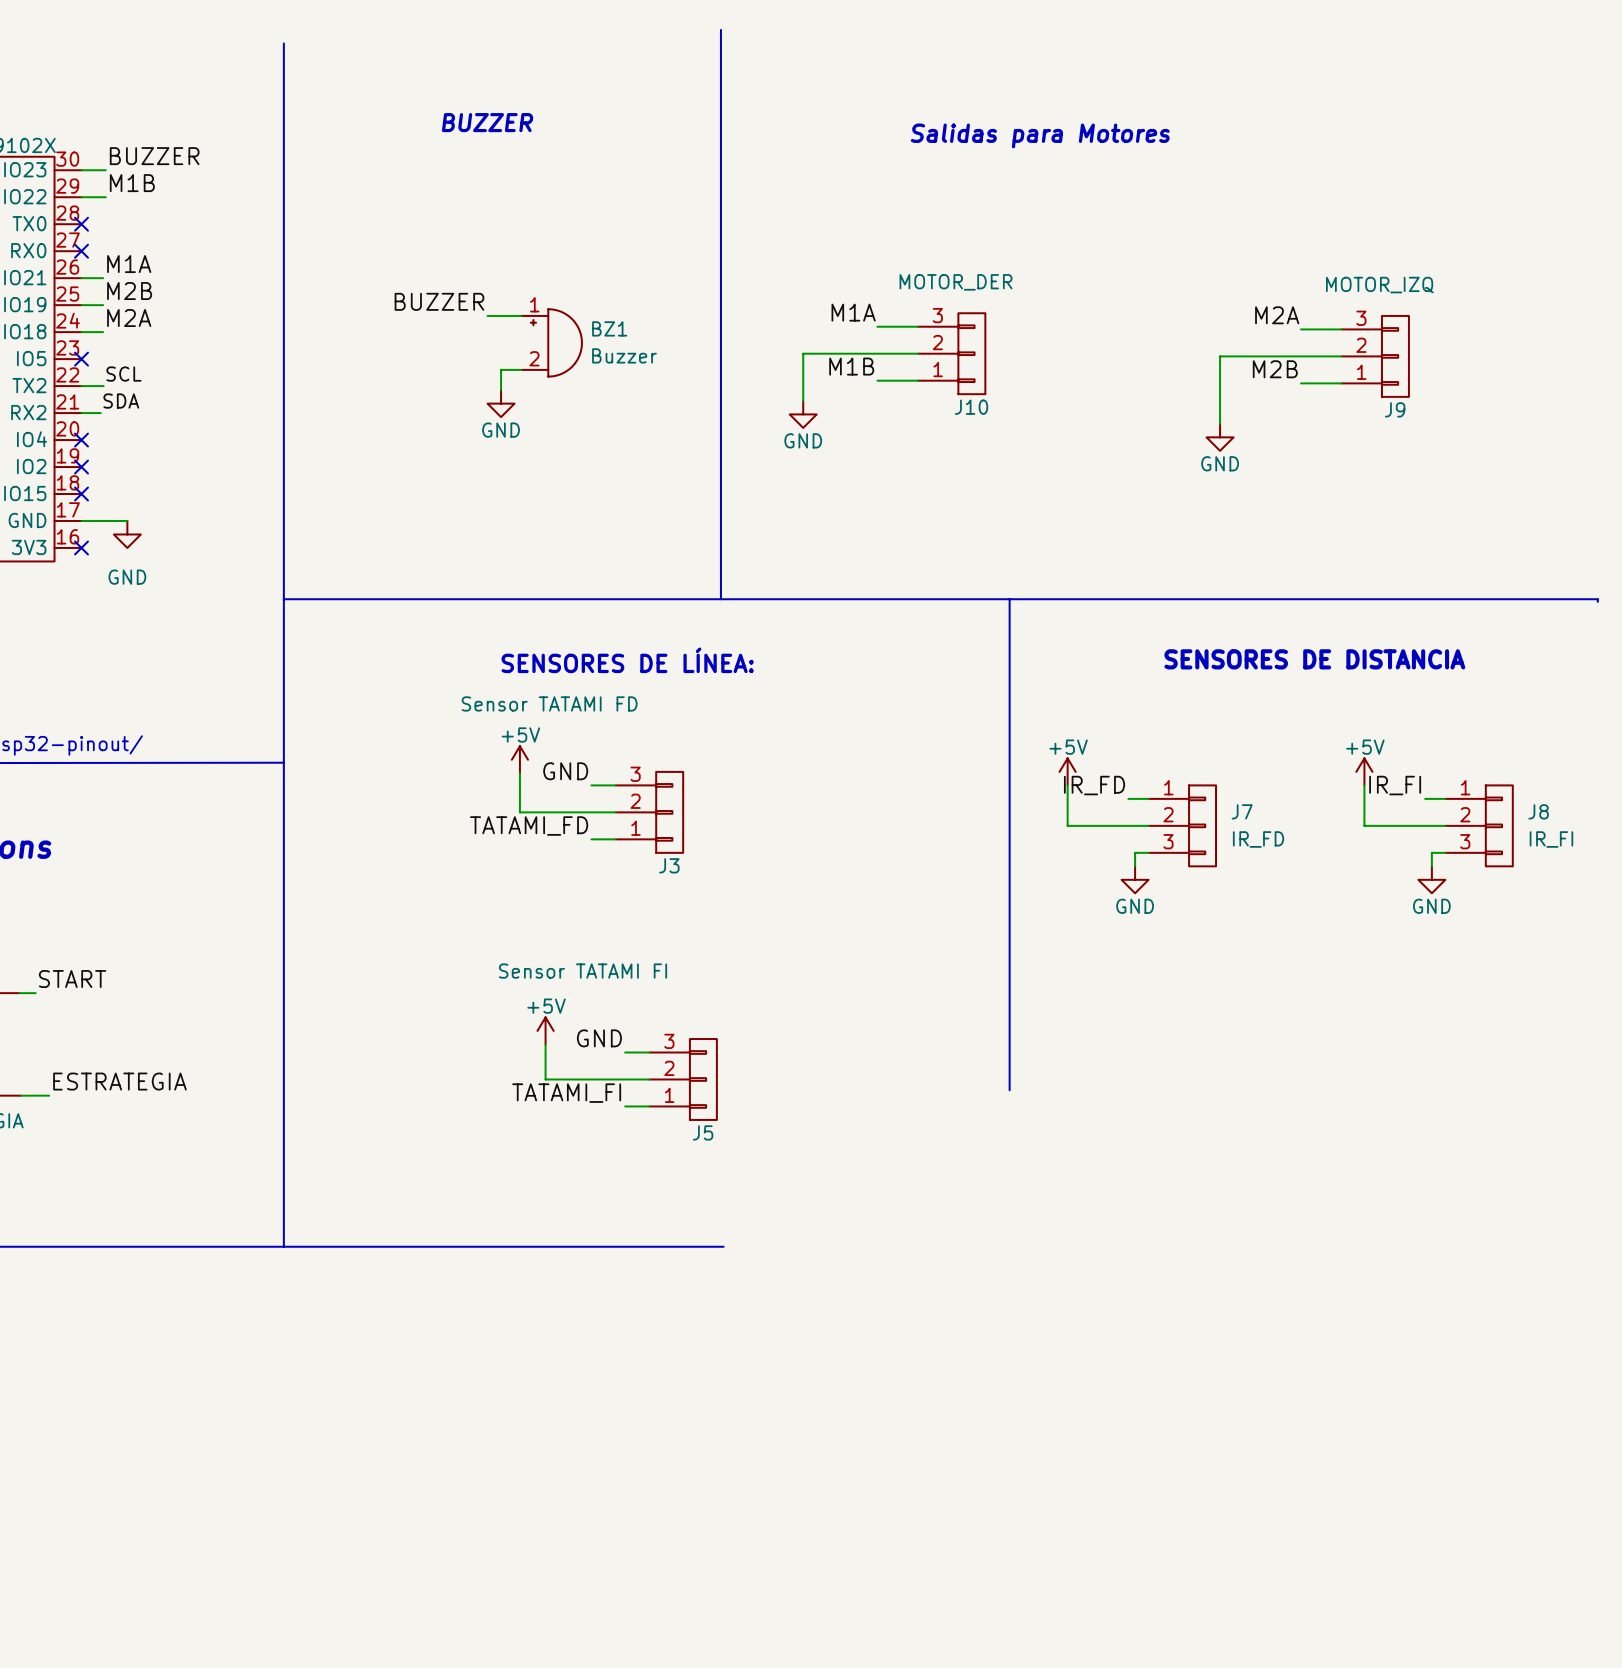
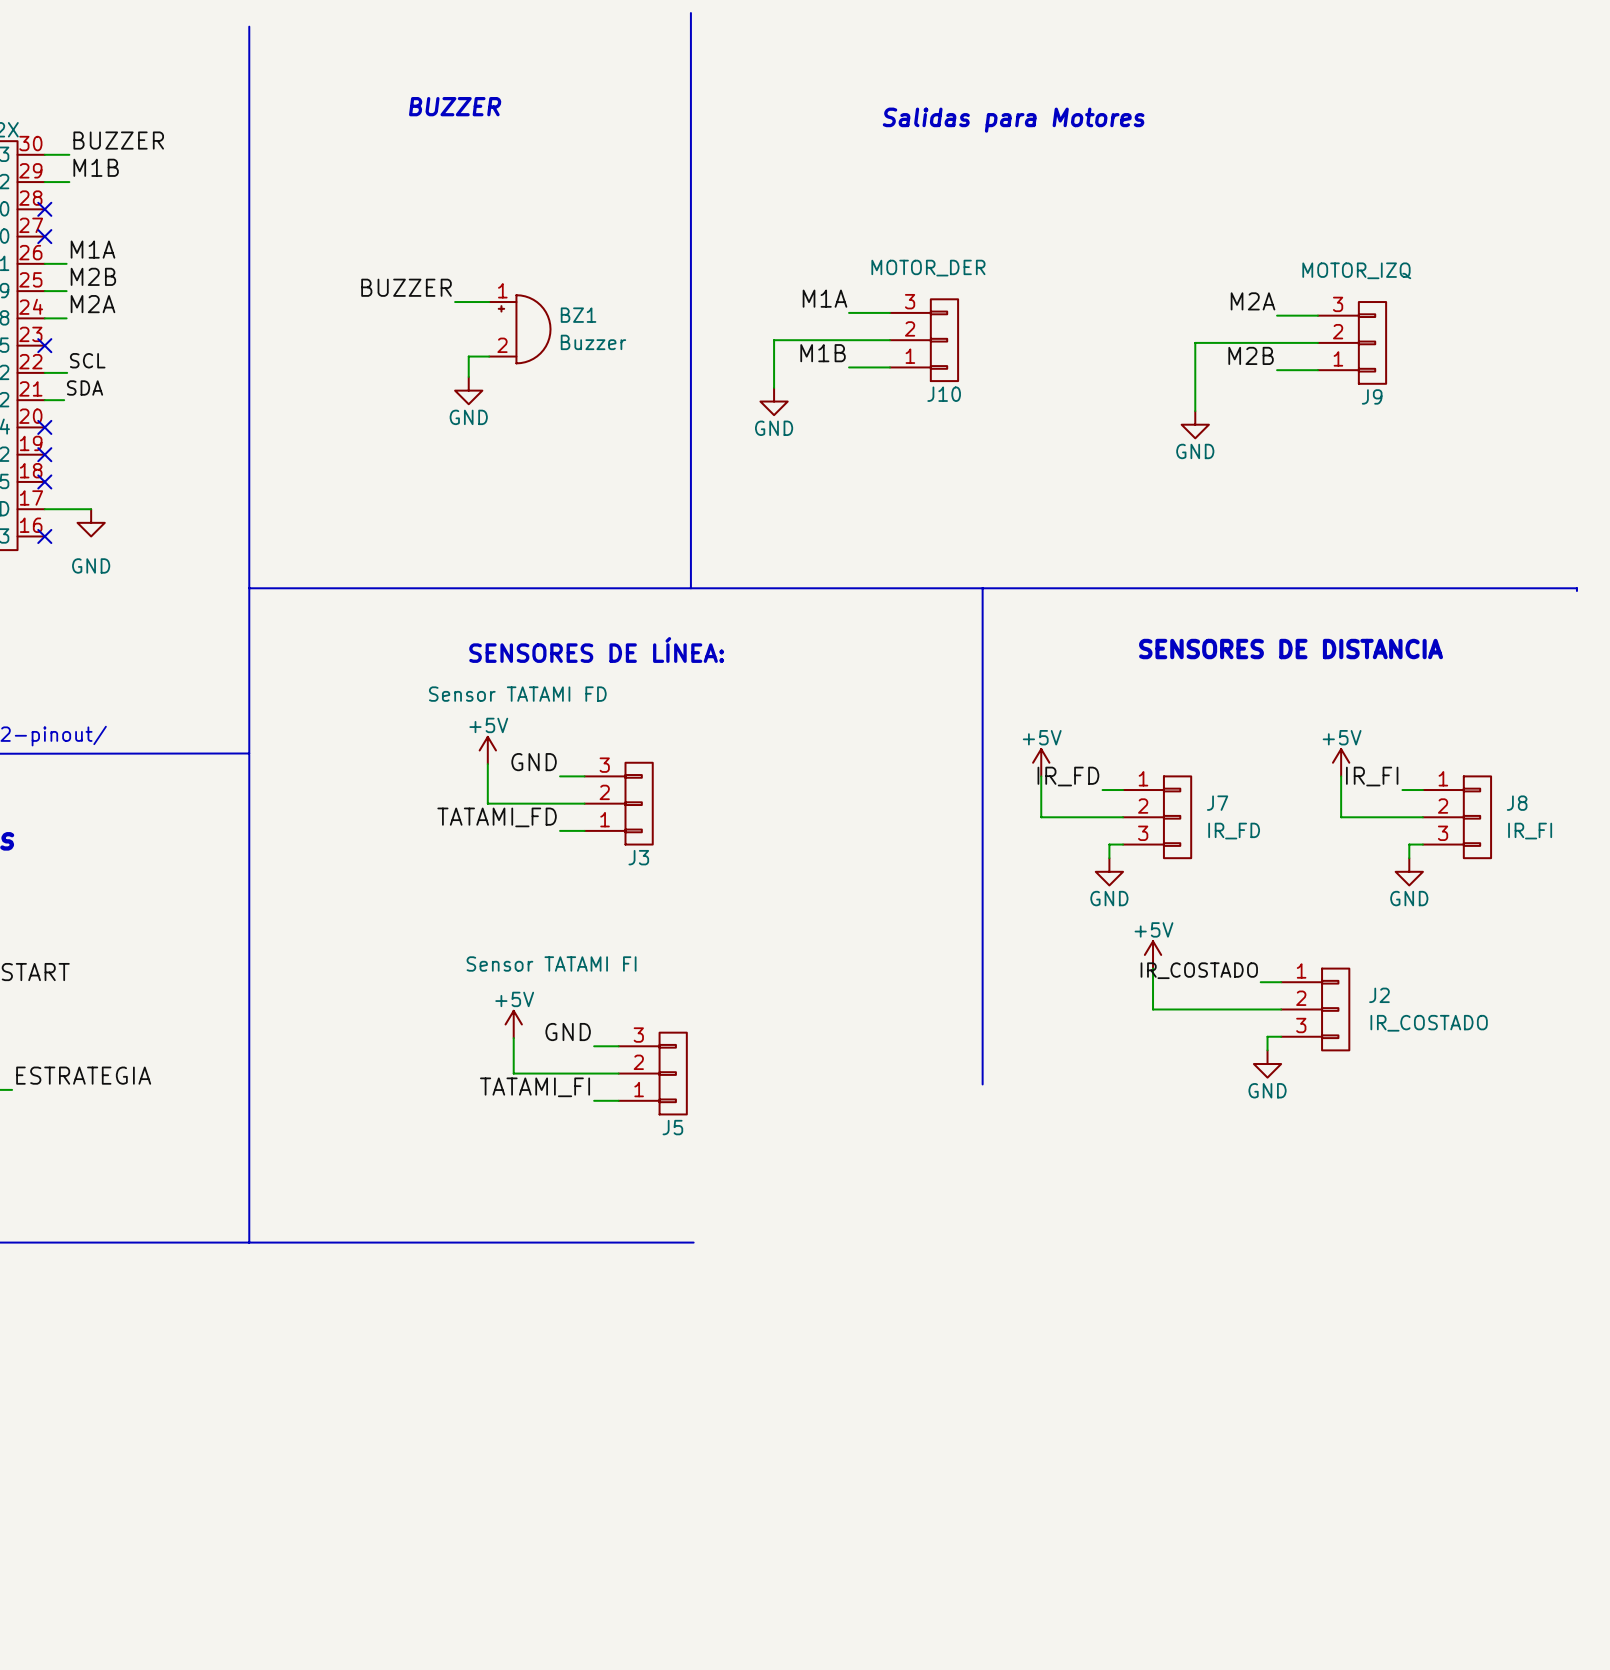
power symbol: none -> +5V (1153, 954)
wire: none -> (1153, 968) (1153, 1009) (1281, 1009)
label: none -> IR_COSTADO (1199, 970)
wire: none -> (1260, 982) (1281, 982)
J2: none -> IR_COSTADO (1315, 1009)
wire: none -> (1281, 1036) (1267, 1036) (1267, 1050)
power symbol: none -> GND (1267, 1064)

